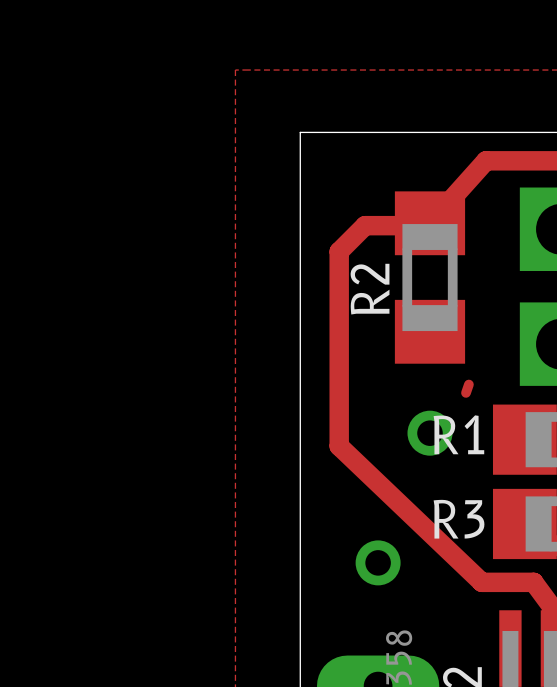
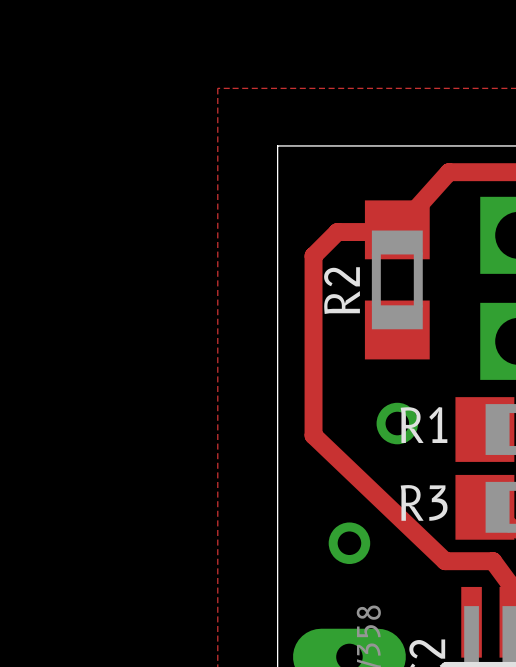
track: (468, 384) (466, 392) -> none

